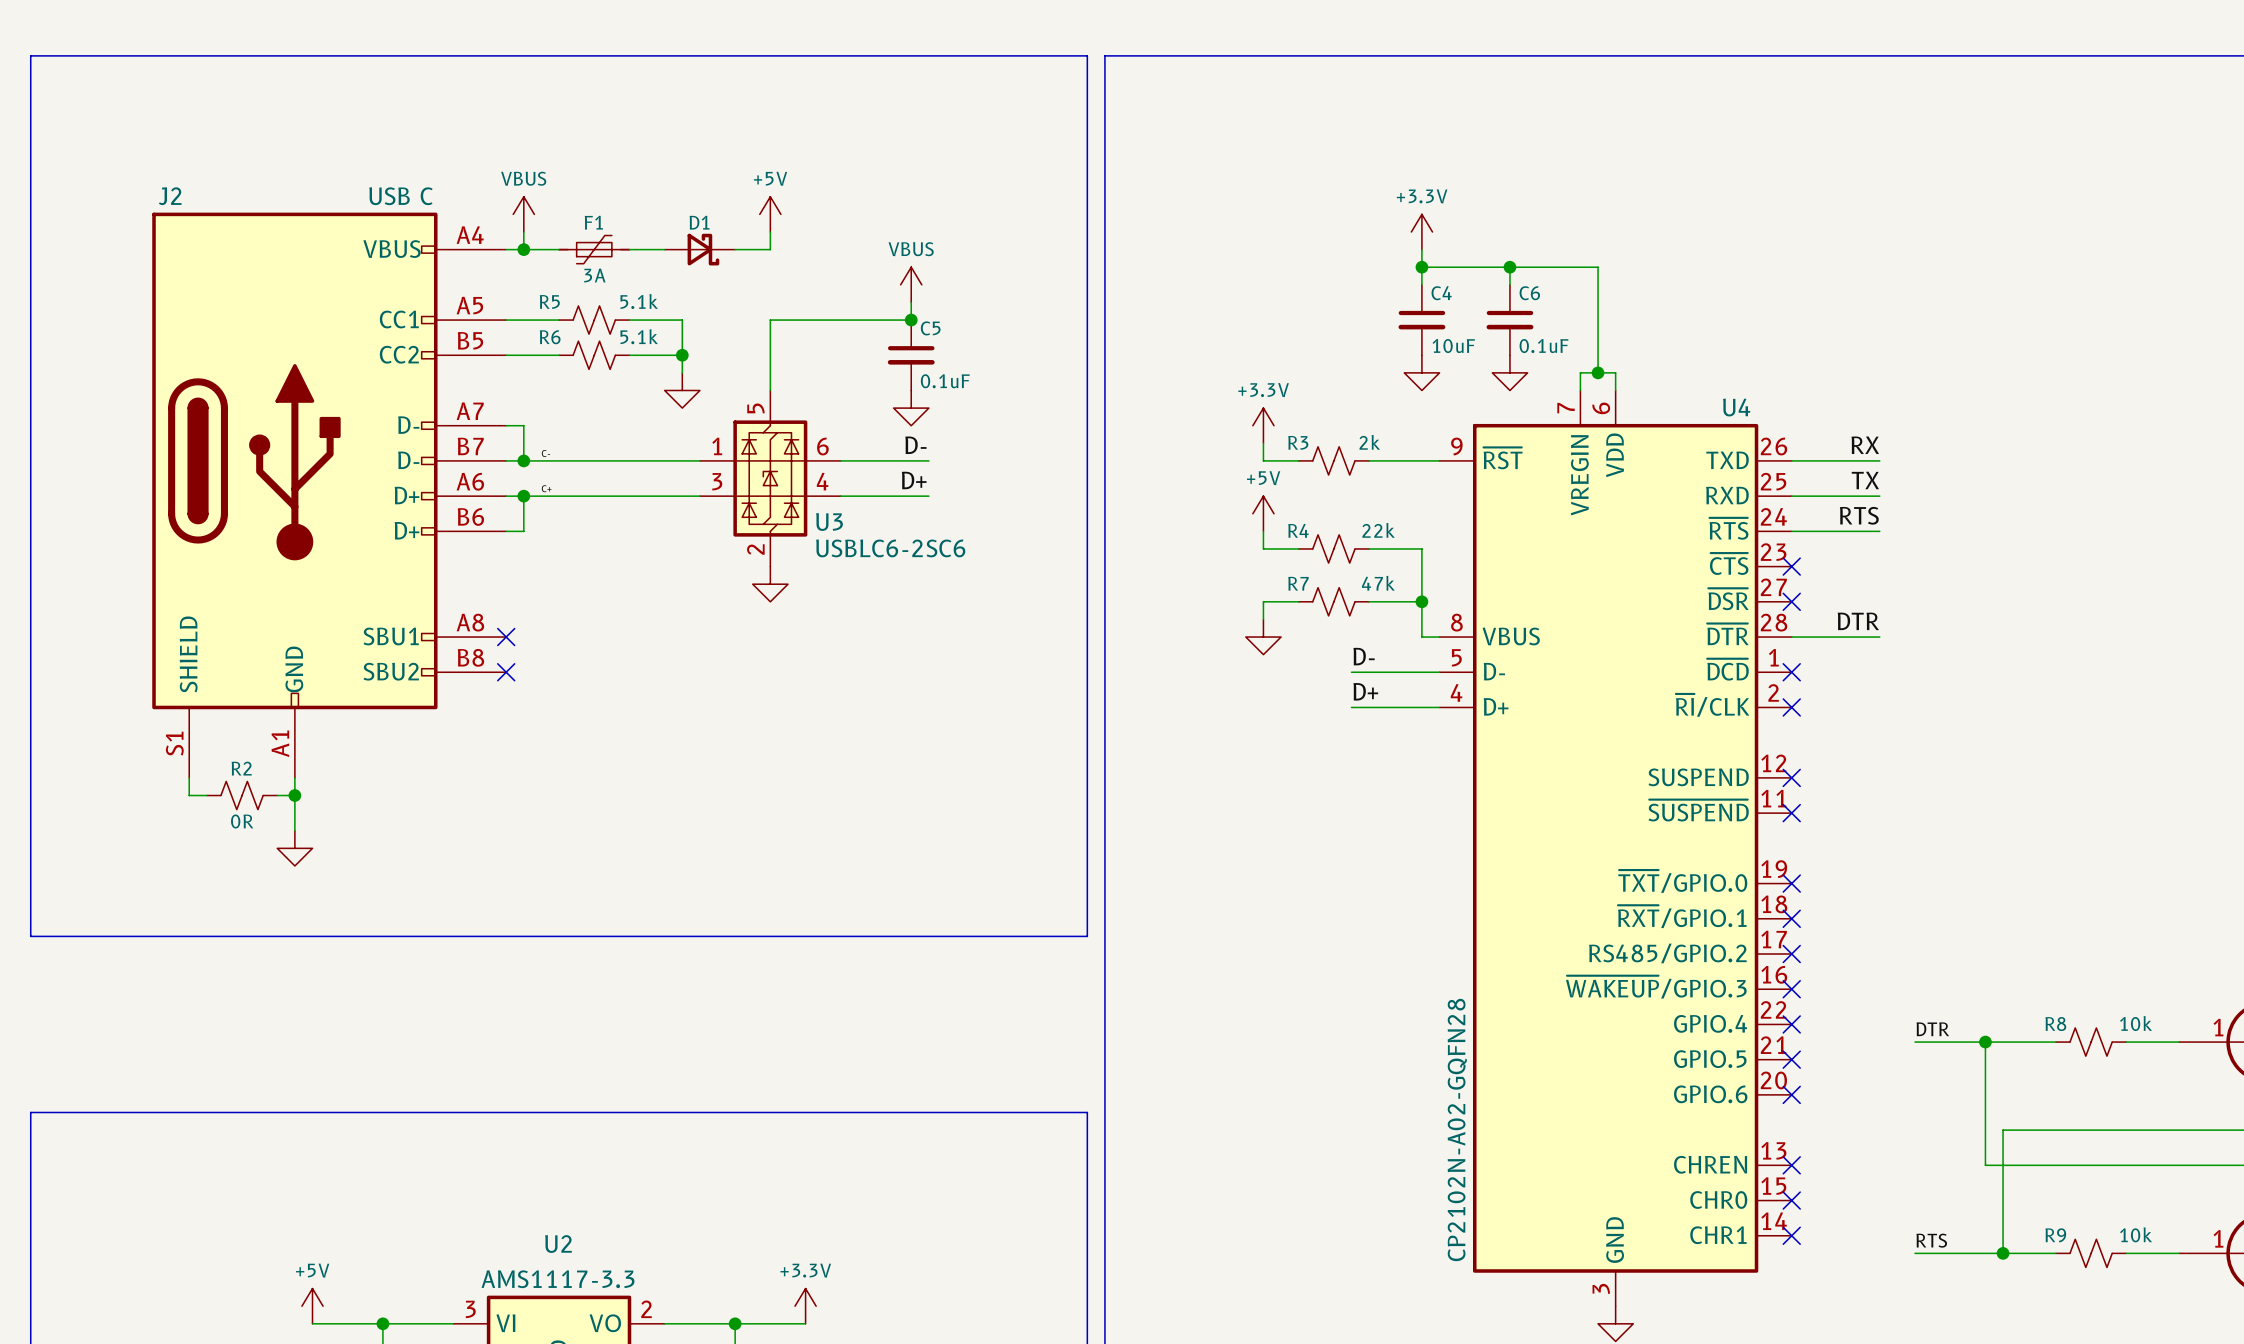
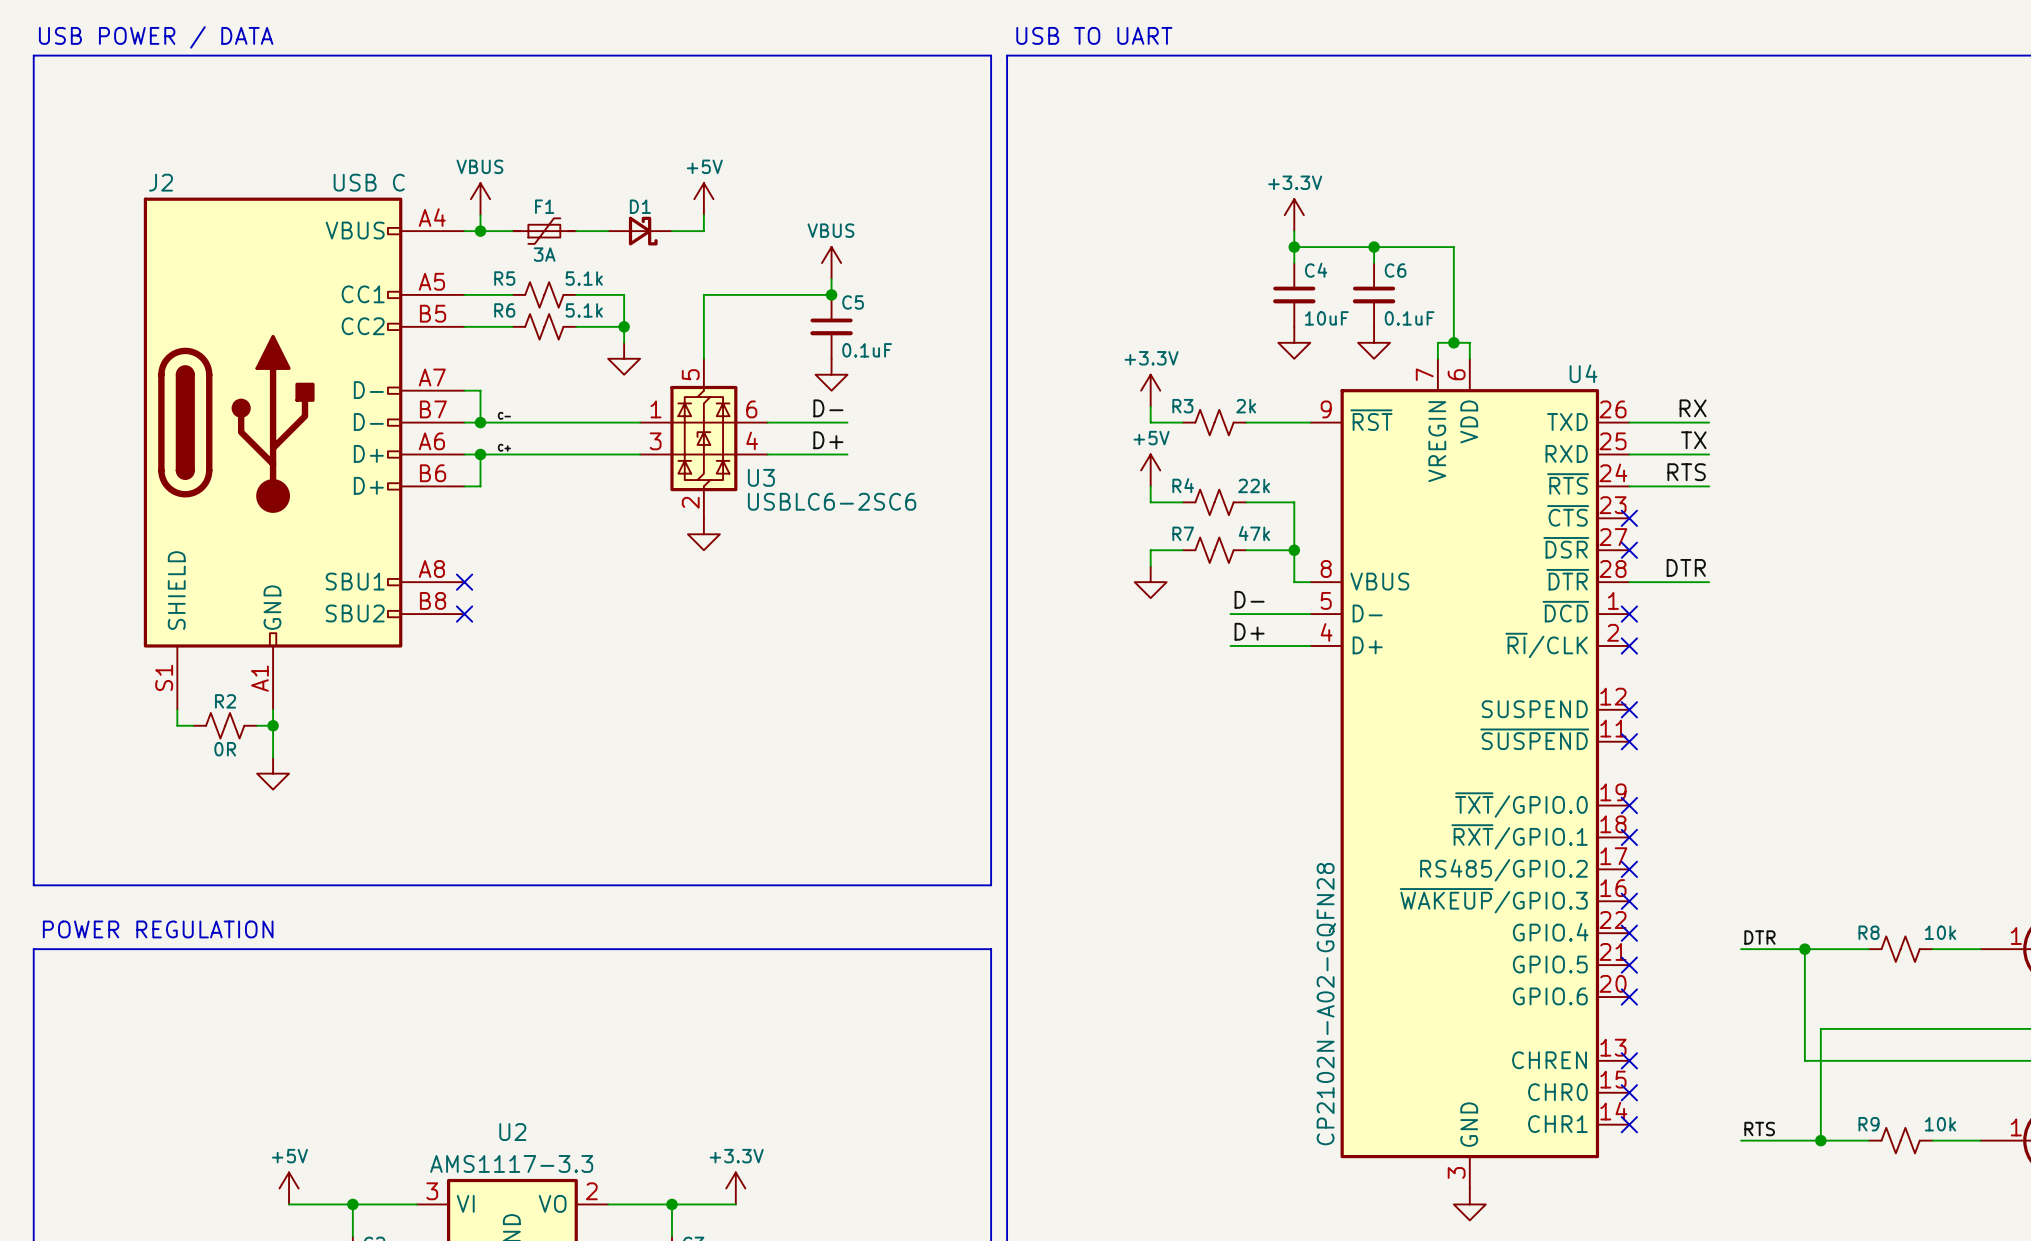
text: none -> USB POWER / DATA (156, 37)
text: none -> USB TO UART (1094, 35)
line: (30, 936) (1087, 936) -> (33, 853) (33, 885) (991, 885) (991, 853)
text: none -> POWER REGULATION (158, 929)
line: (30, 1112) (1087, 1112) -> (33, 1012) (33, 949) (991, 949) (991, 1012)

